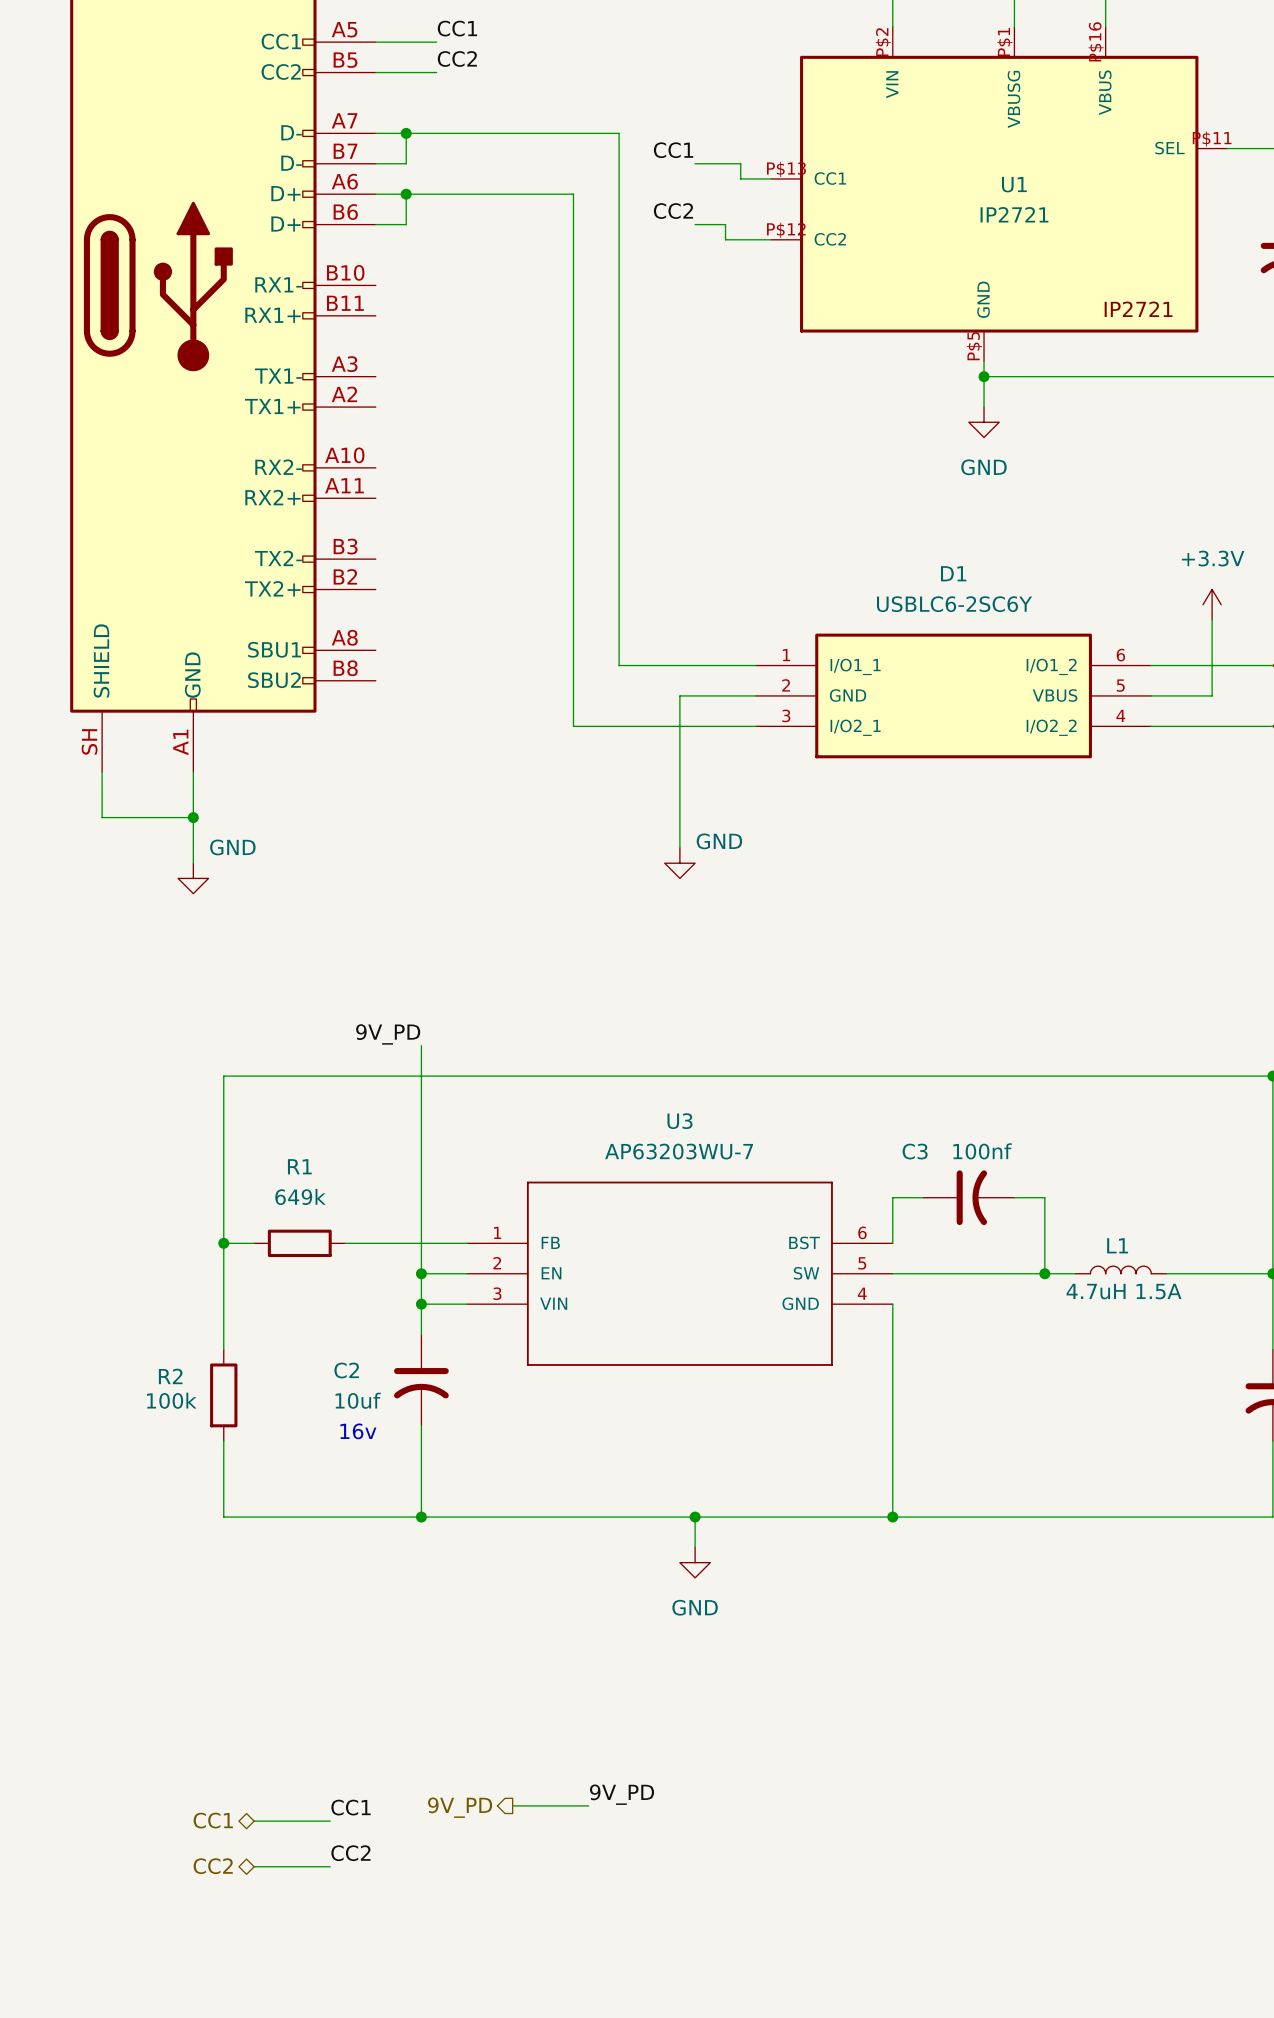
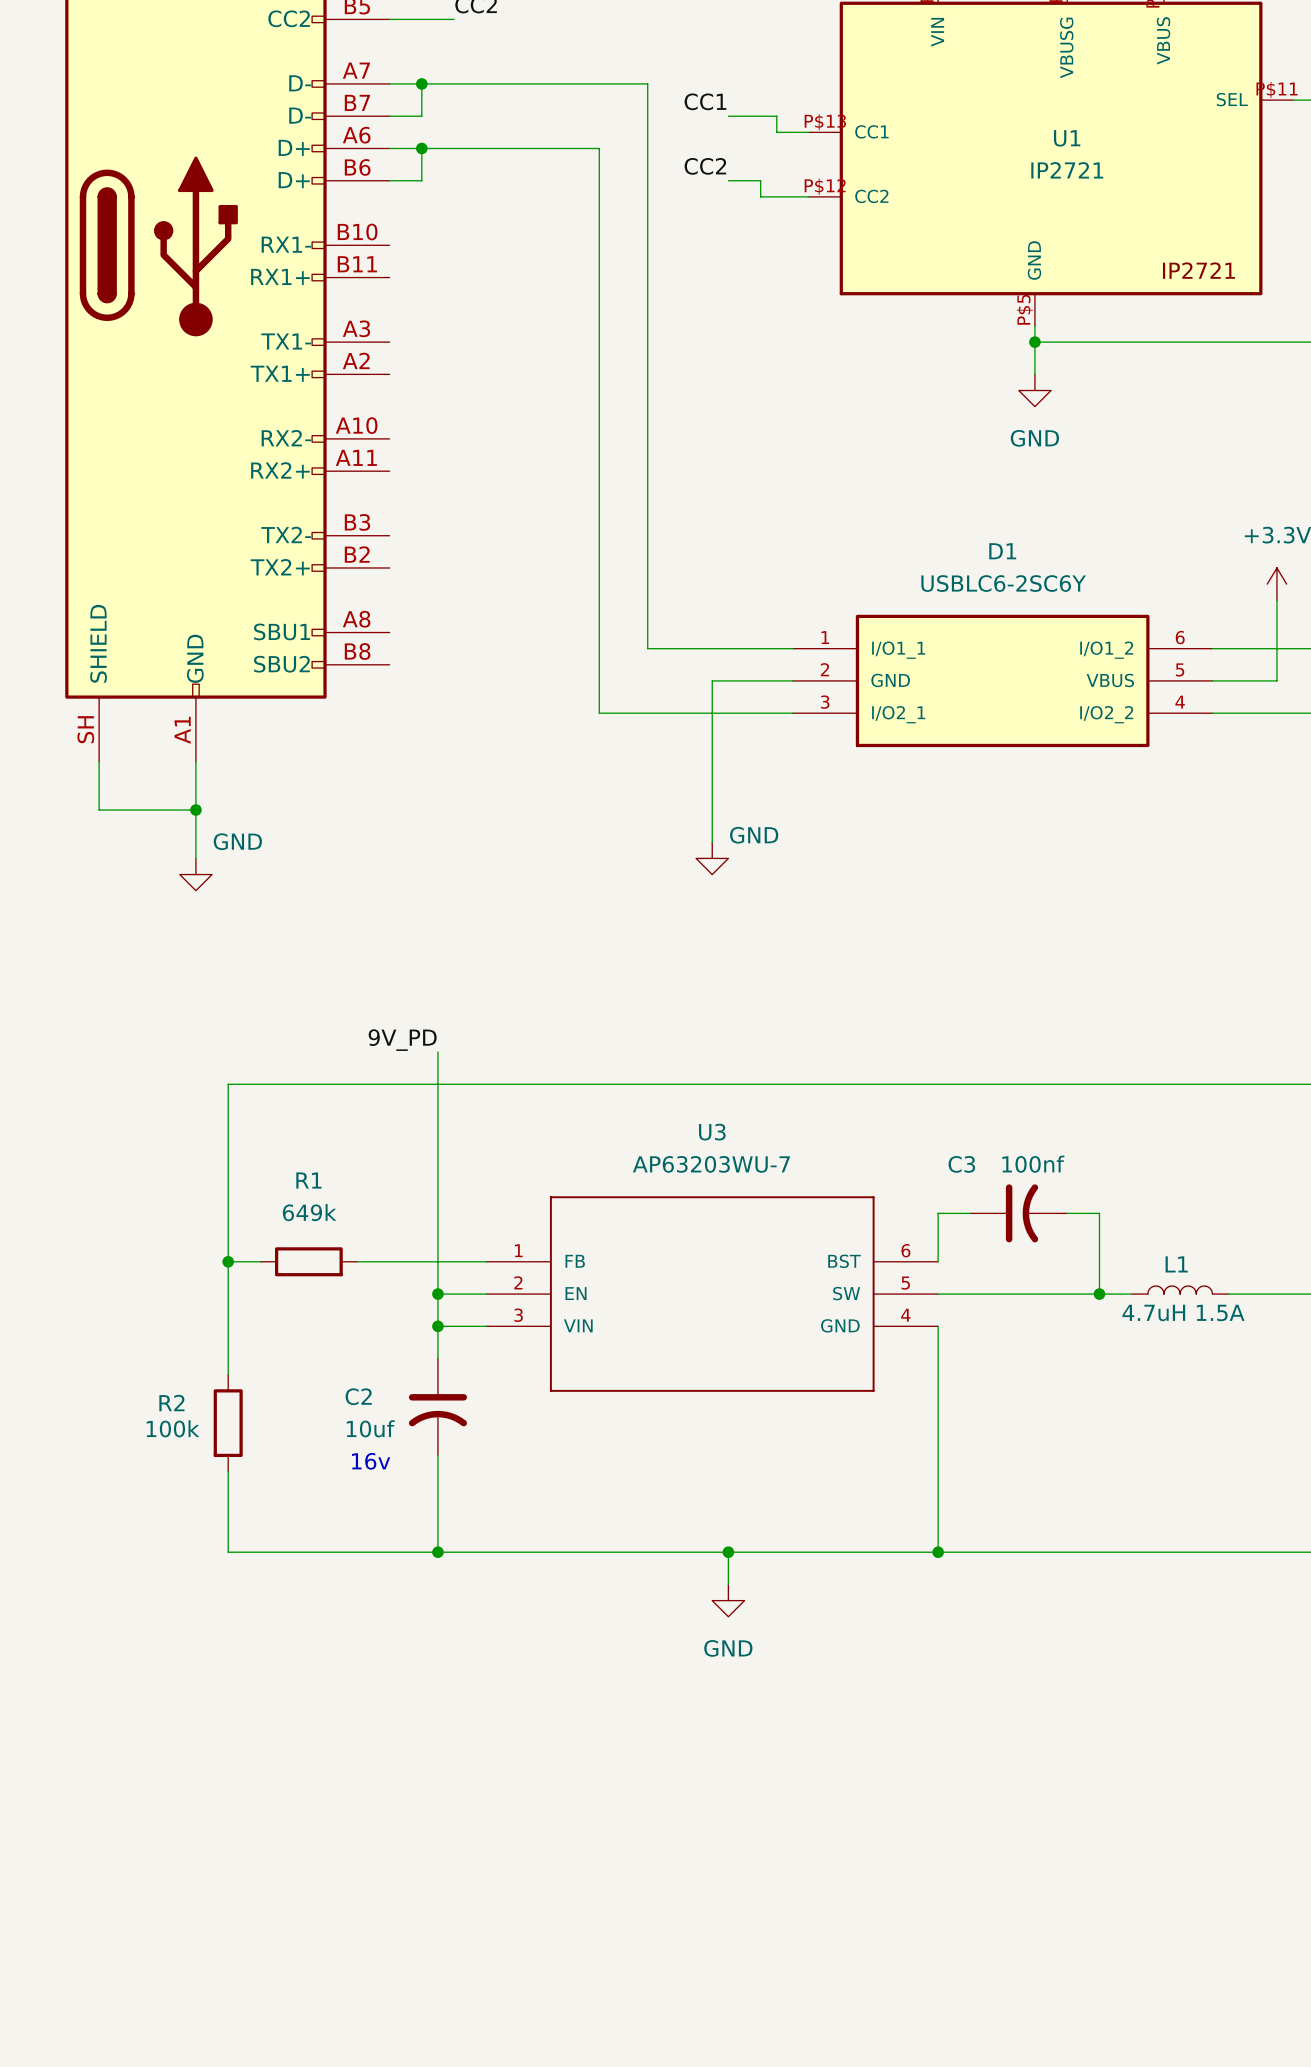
label: 9V_PD (622, 1794) -> none
wire: (512, 1805) (588, 1805) -> none
label: CC1 (351, 1807) -> none
hierarchical label: 9V_PD (460, 1807) -> none
hierarchical label: CC1 (213, 1820) -> none
wire: (254, 1821) (330, 1821) -> none
label: CC2 (350, 1853) -> none
hierarchical label: CC2 (213, 1866) -> none
wire: (254, 1866) (330, 1866) -> none

